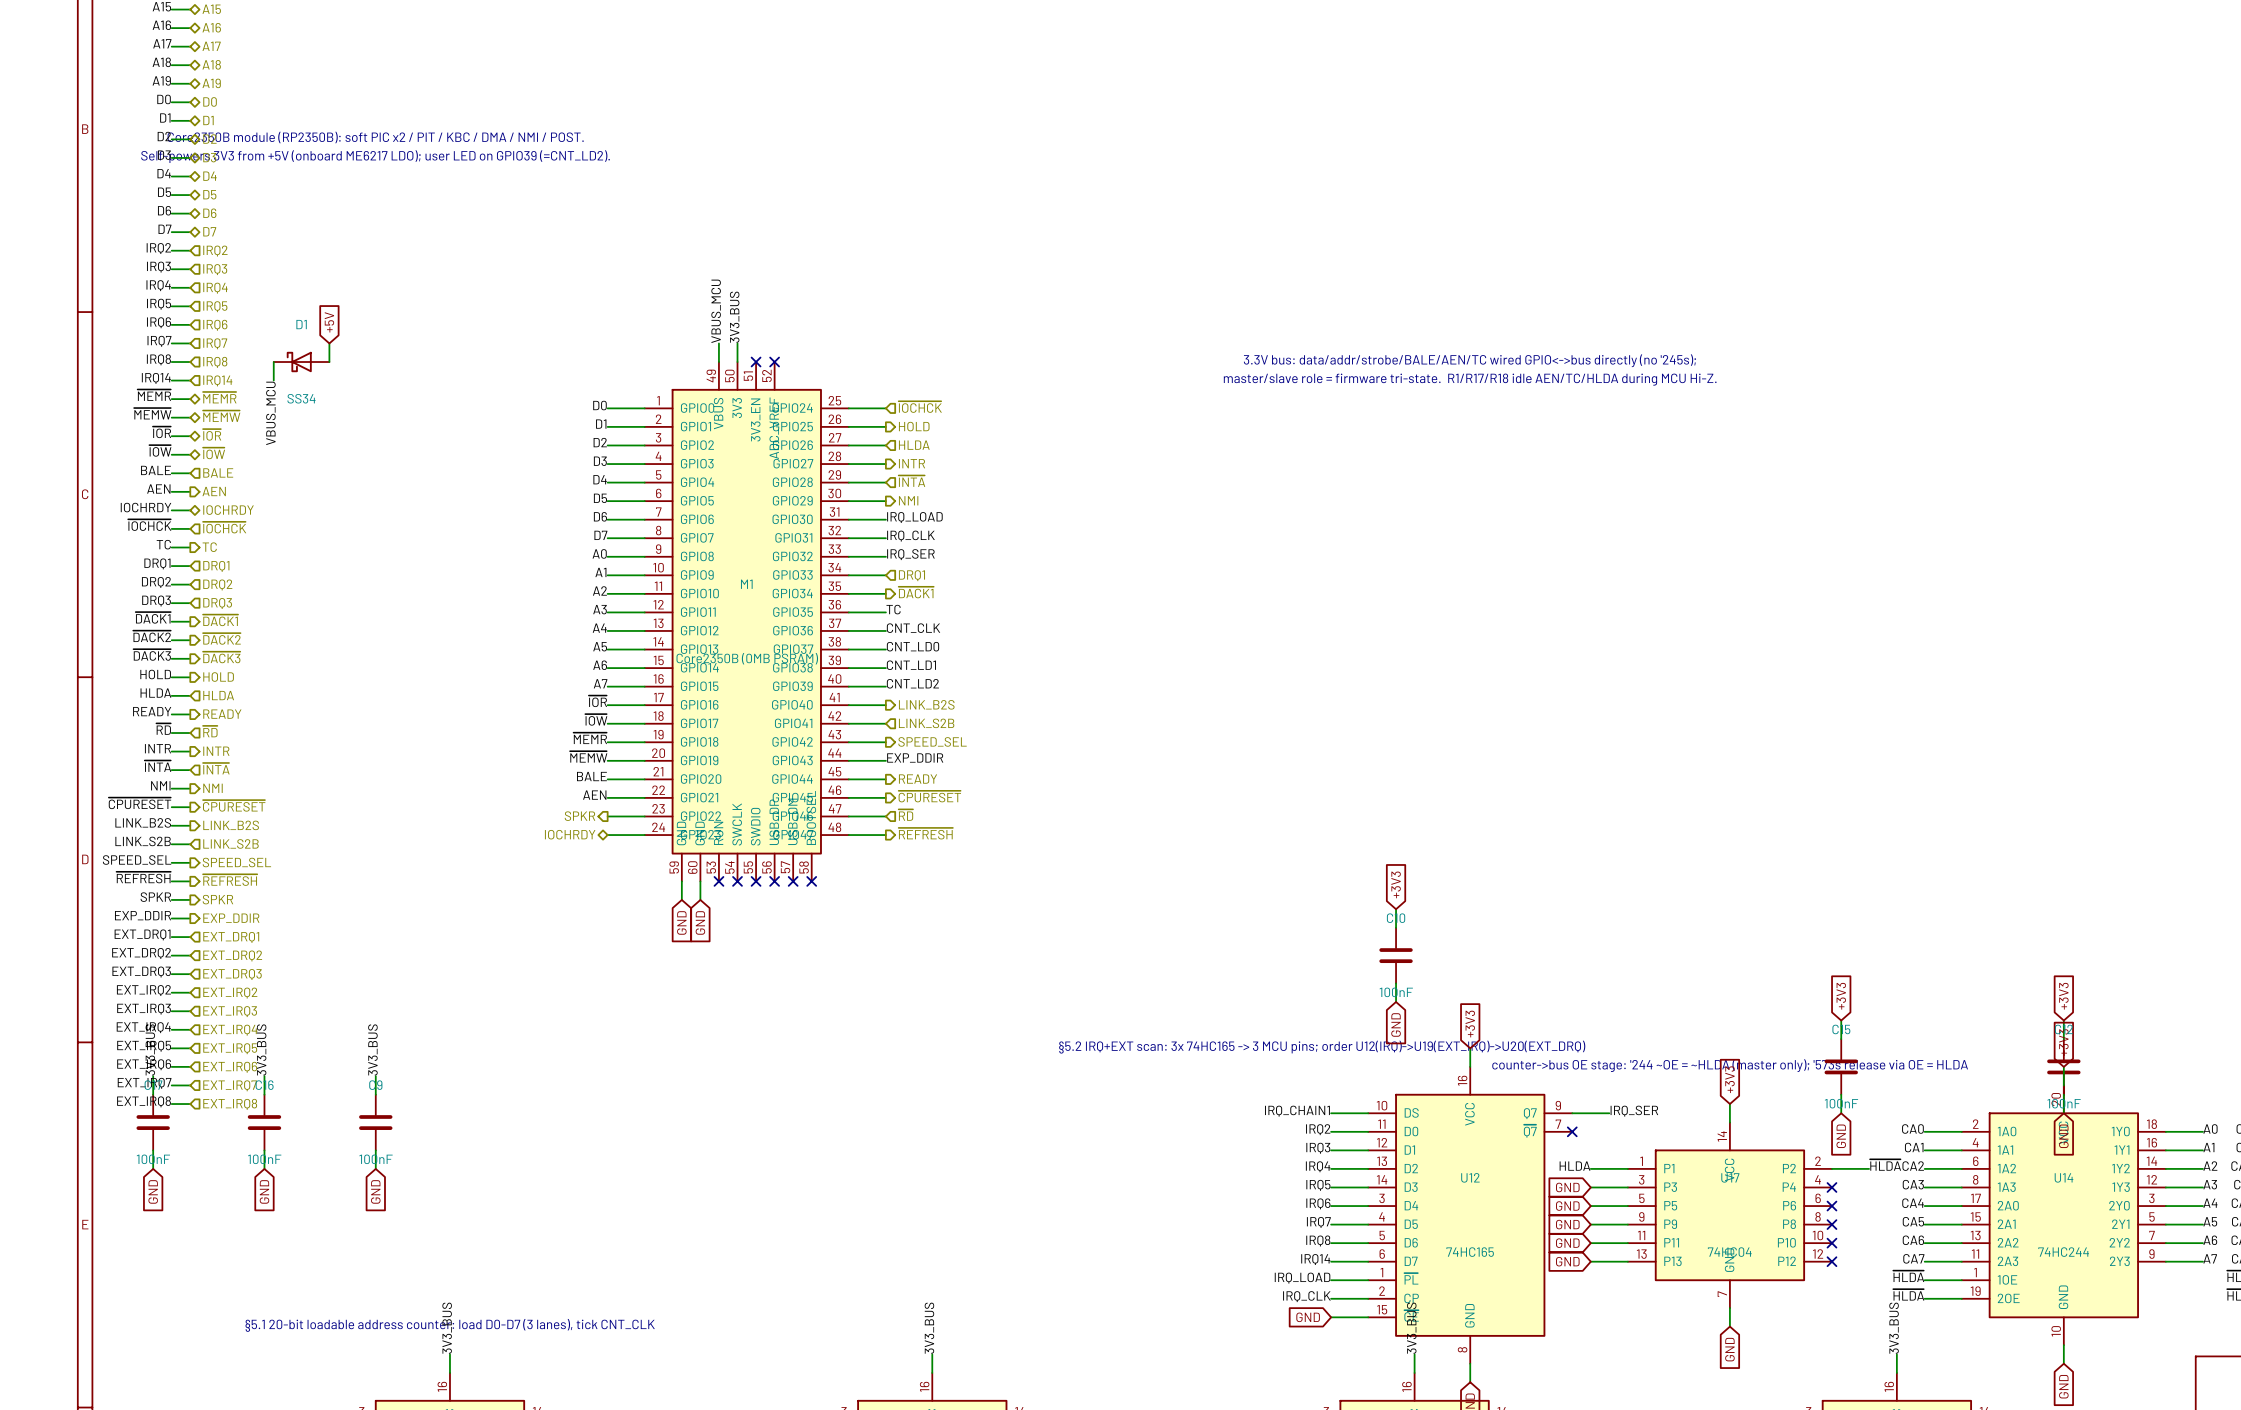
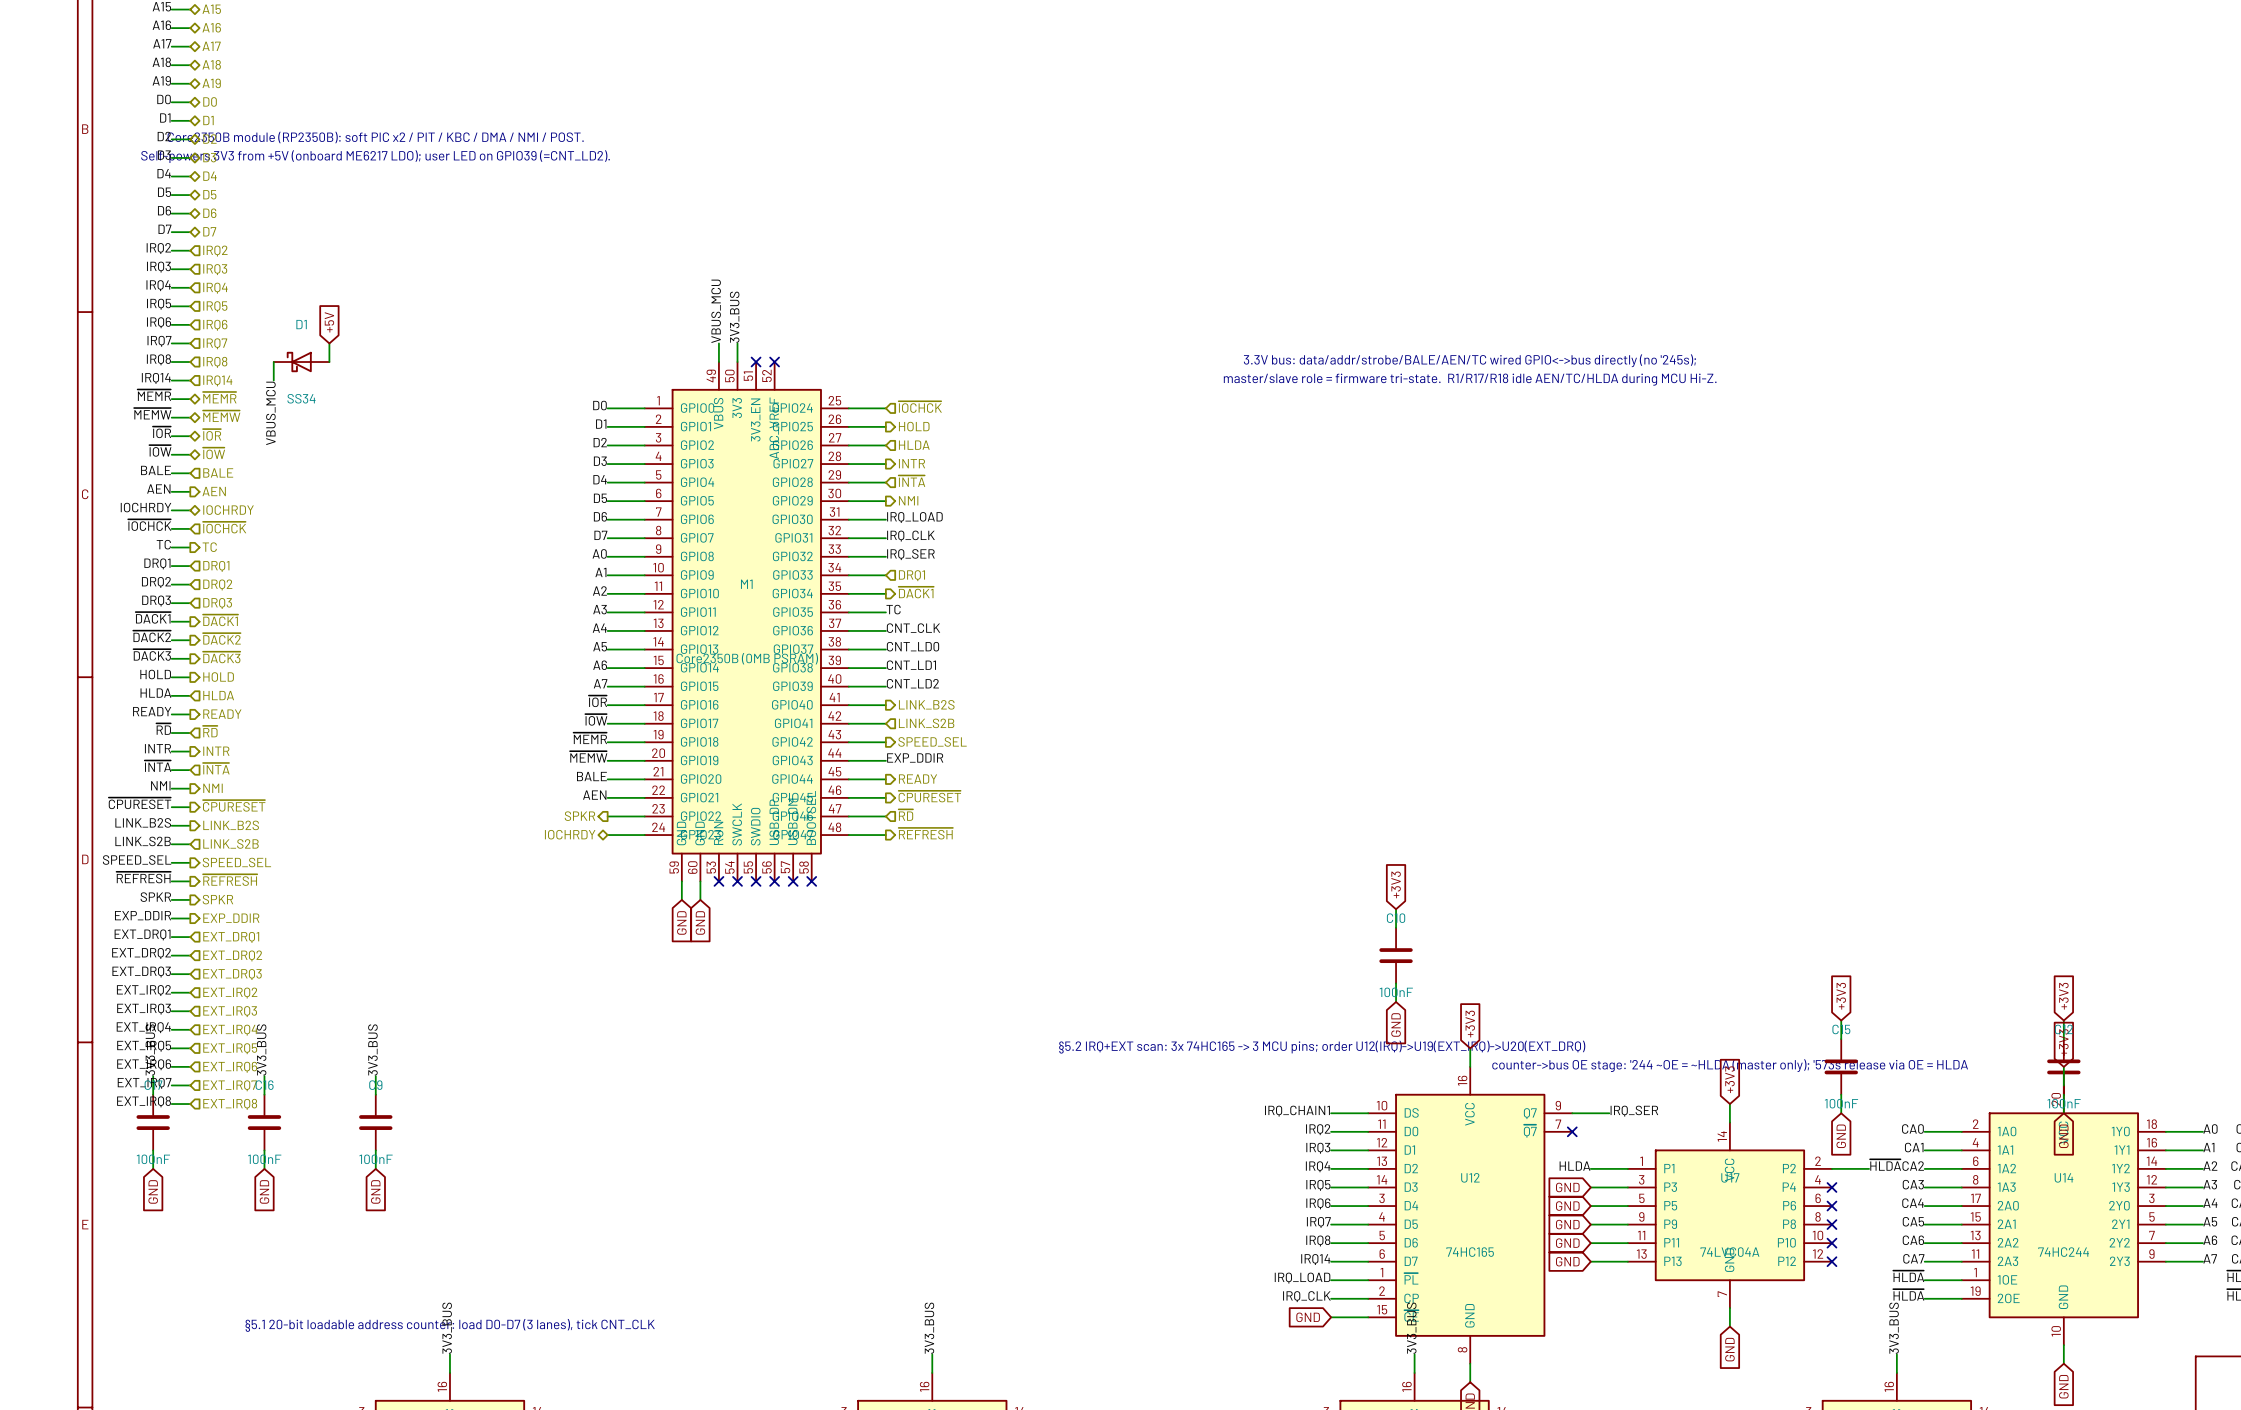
U17 value: 74HC04 (1729, 1252) -> 74LVC04A (1729, 1252)

